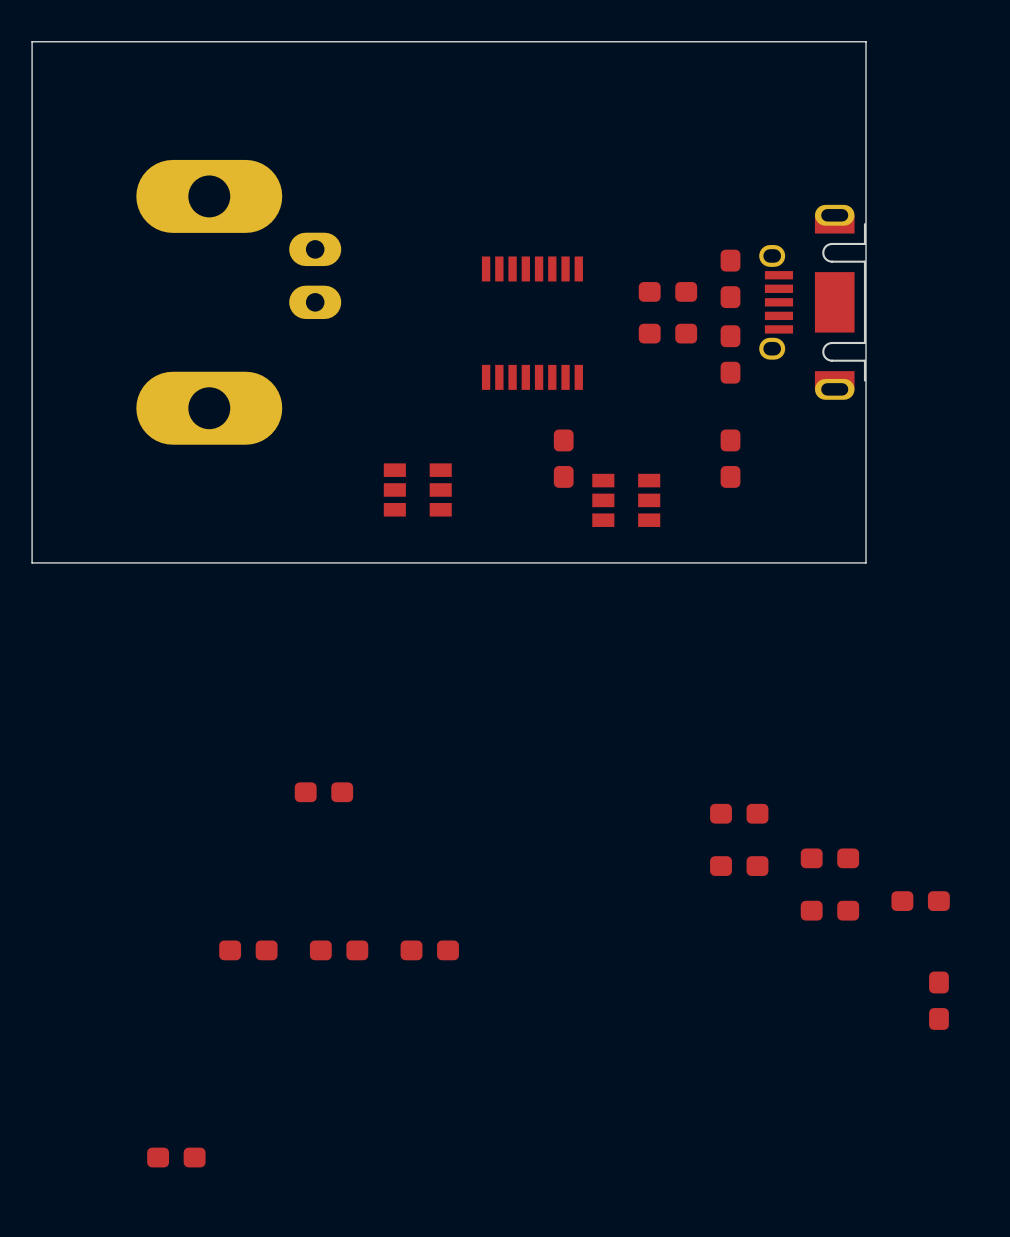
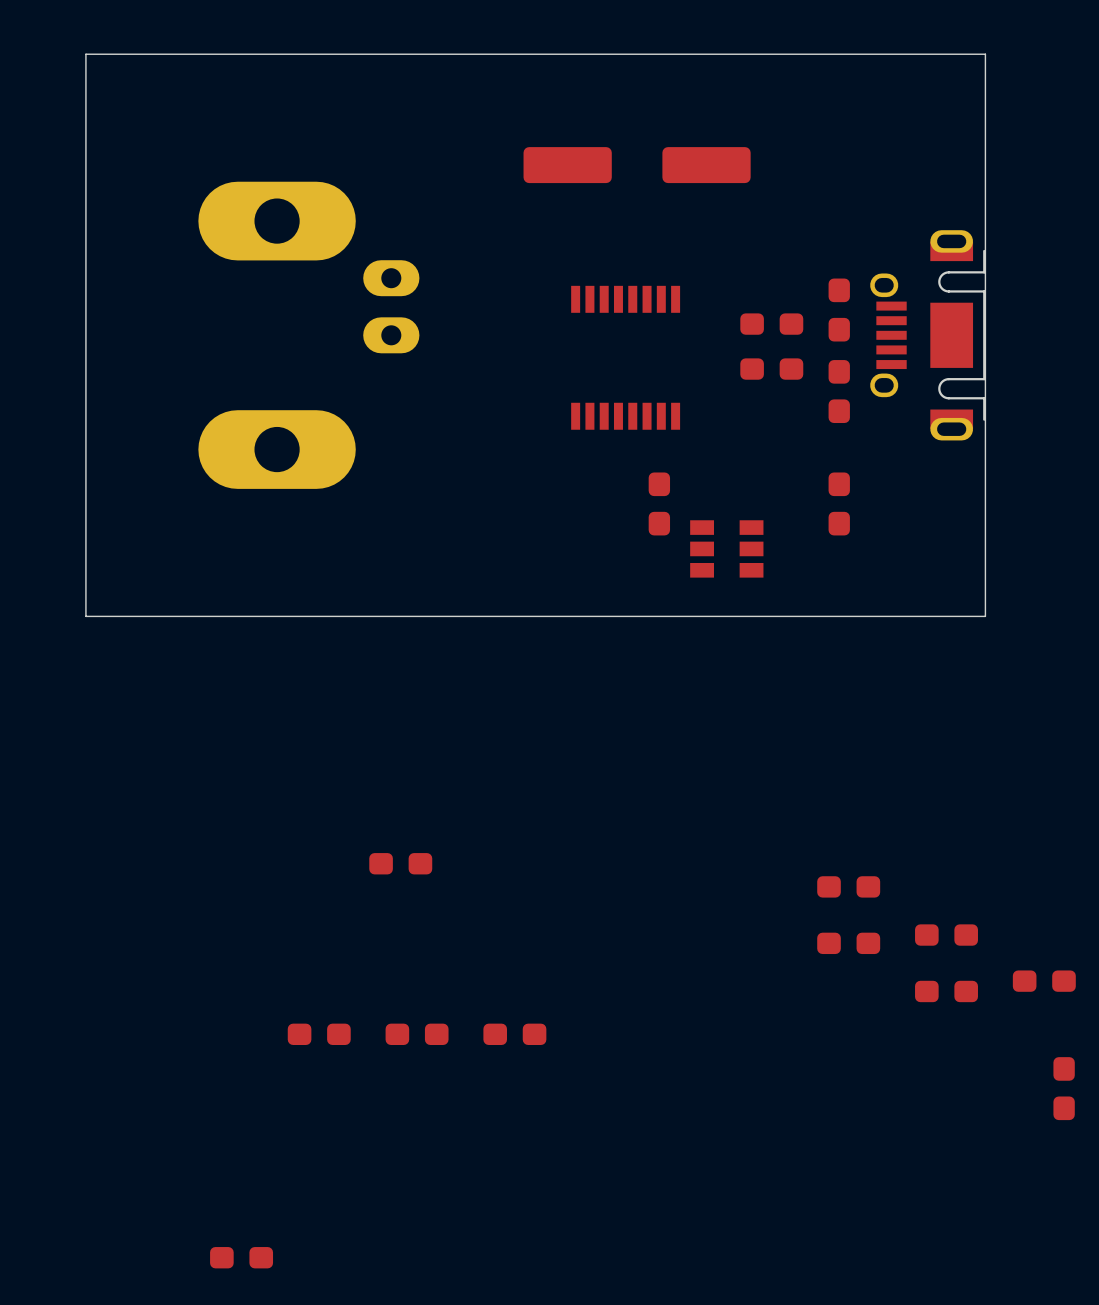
part: none -> (637, 165)
part: (417, 489) -> none

